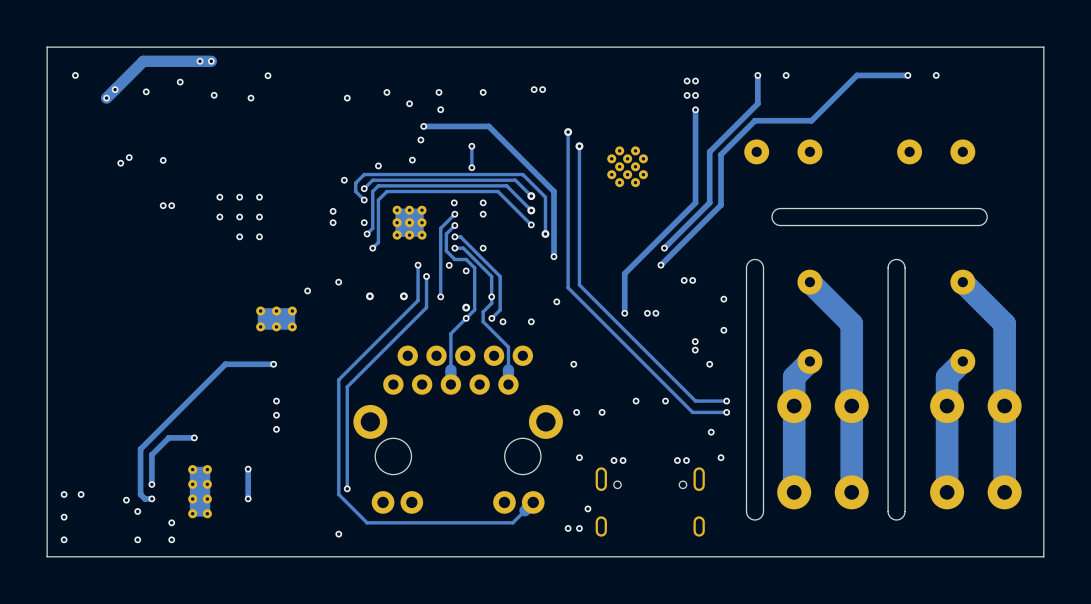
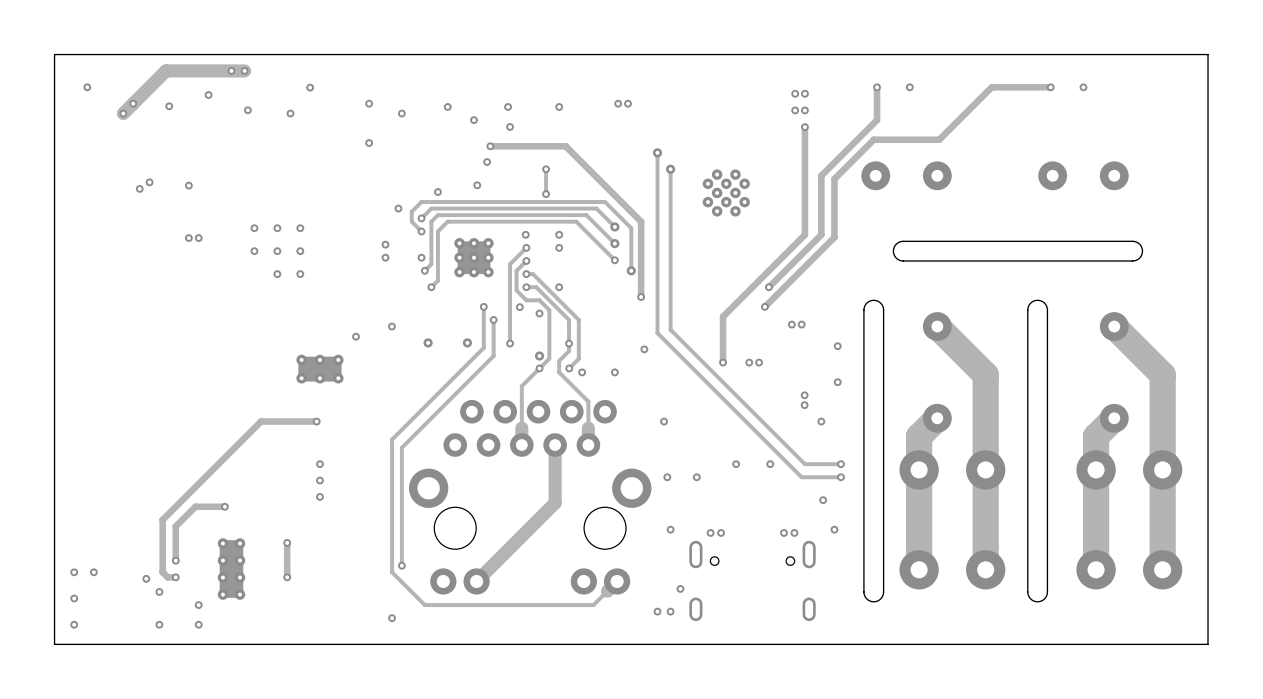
via: none -> (369, 103)
via: none -> (369, 143)
track: none -> (555, 445) (555, 502) (476, 581)

